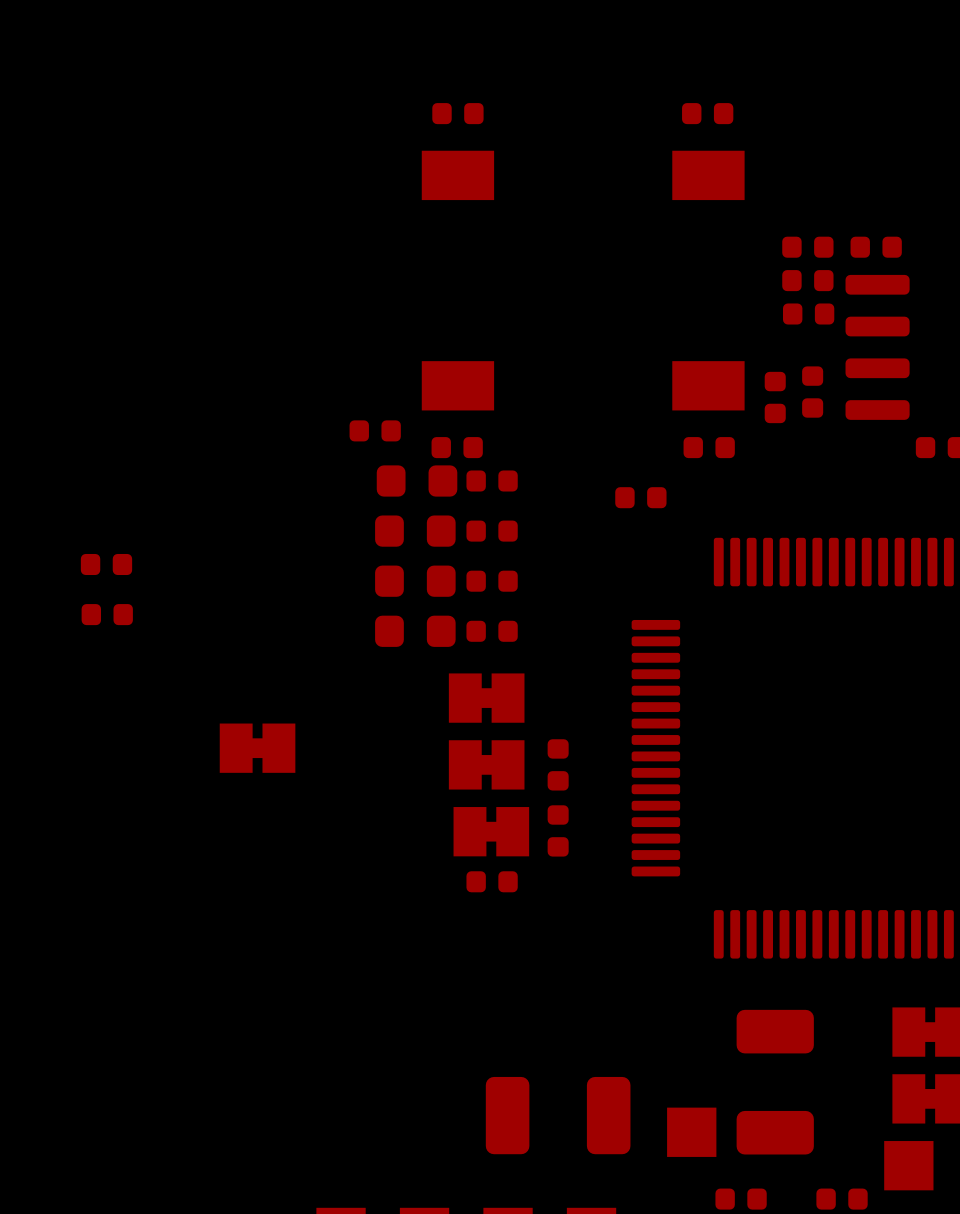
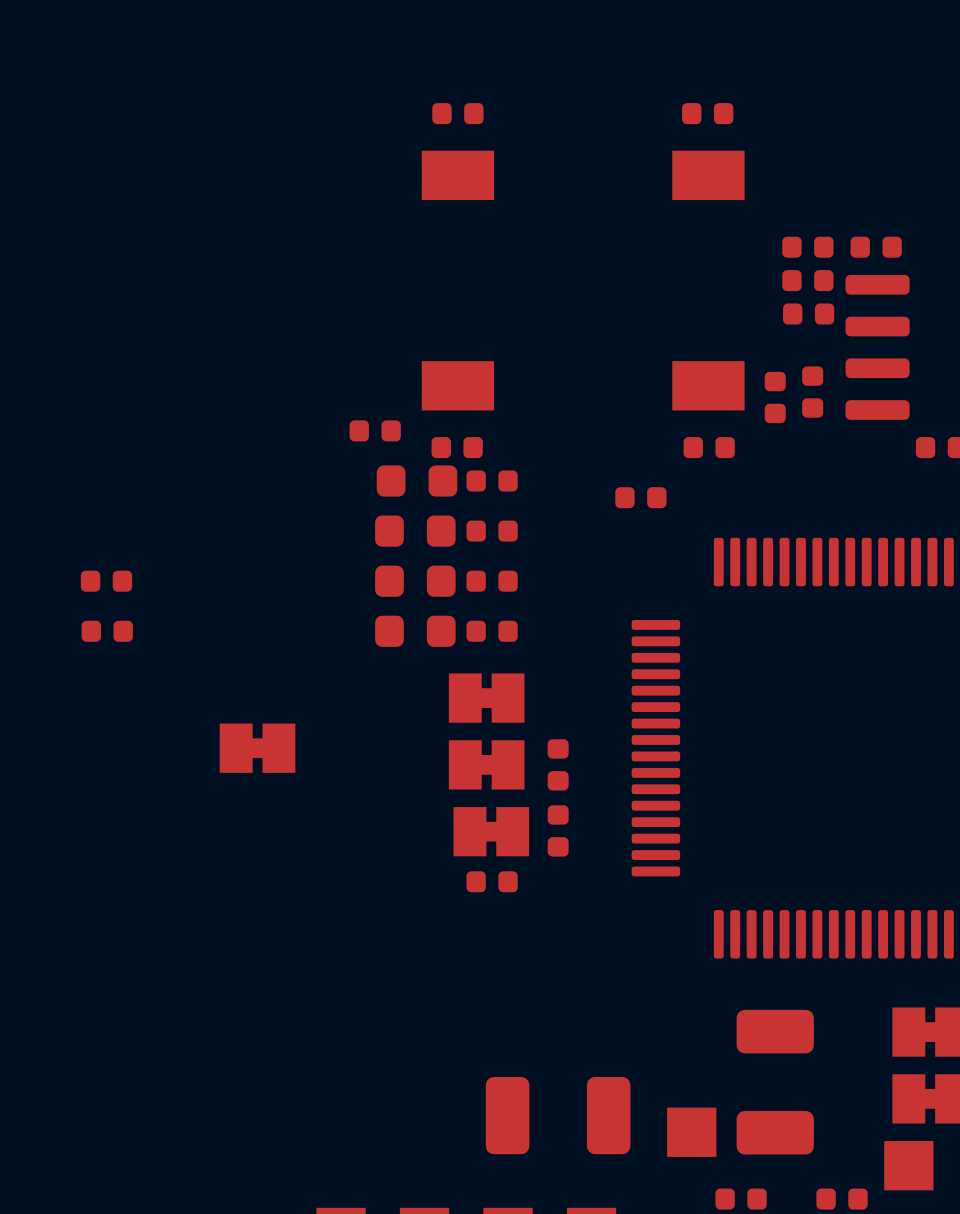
part: (106, 564) -> none
part: none -> (106, 581)
part: (107, 614) -> none
part: none -> (107, 631)

